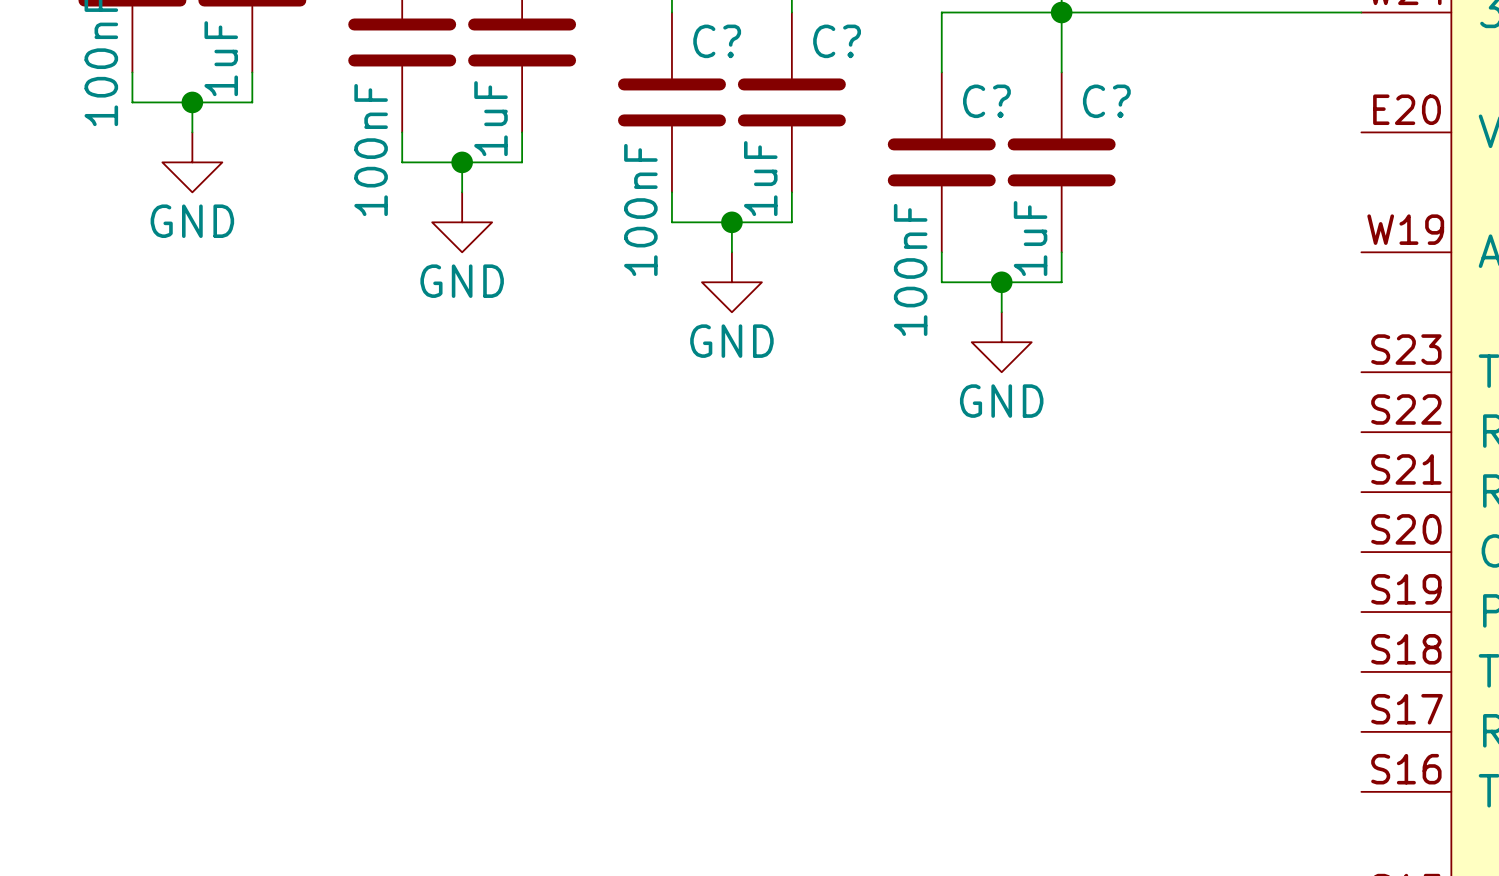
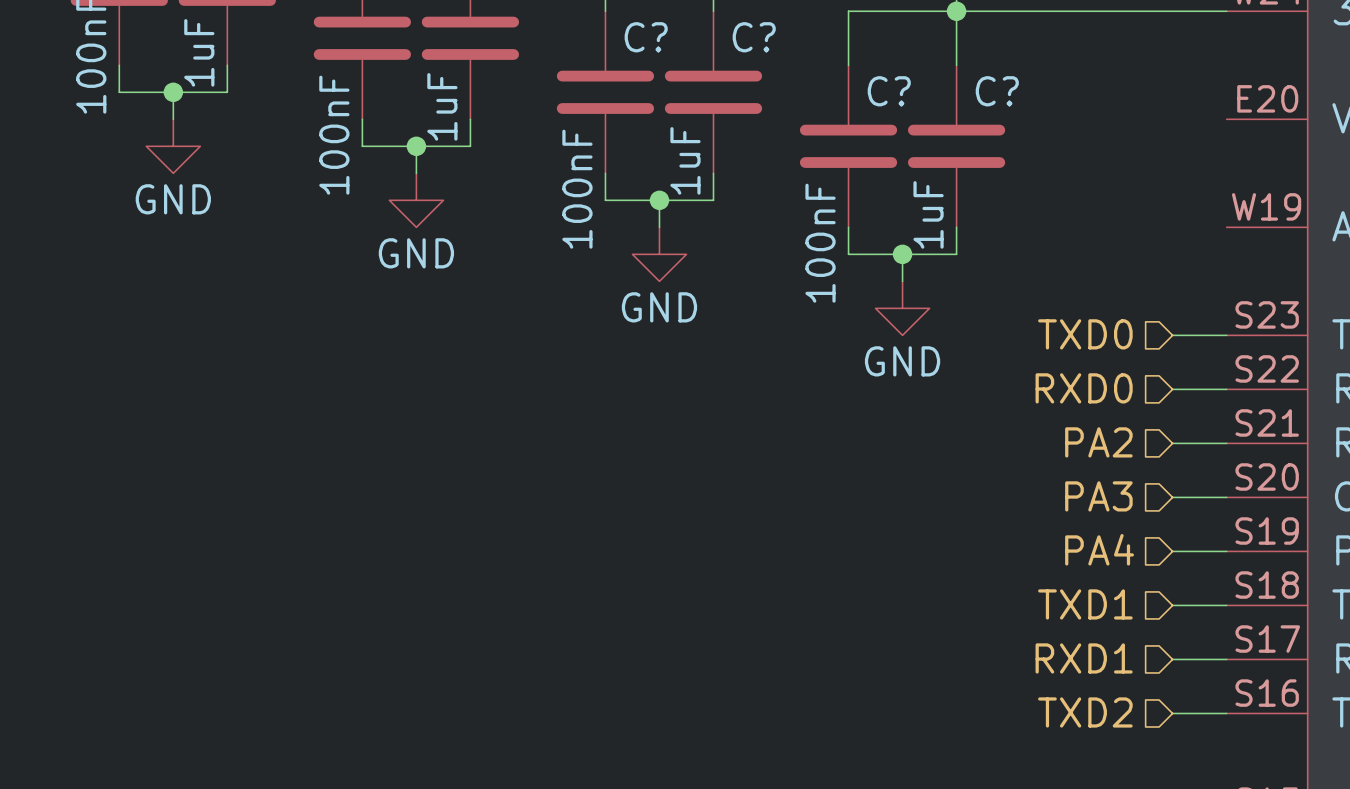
hierarchical label: none -> TXD0 (1085, 334)
wire: none -> (1172, 335) (1226, 335)
hierarchical label: none -> RXD0 (1084, 388)
wire: none -> (1172, 389) (1226, 389)
hierarchical label: none -> PA2 (1098, 442)
wire: none -> (1172, 443) (1226, 443)
hierarchical label: none -> PA3 (1098, 496)
wire: none -> (1172, 497) (1226, 497)
hierarchical label: none -> PA4 (1099, 549)
wire: none -> (1172, 551) (1226, 551)
hierarchical label: none -> TXD1 (1085, 604)
wire: none -> (1172, 605) (1226, 605)
hierarchical label: none -> RXD1 (1084, 658)
wire: none -> (1172, 659) (1226, 659)
hierarchical label: none -> TXD2 (1085, 712)
wire: none -> (1172, 713) (1226, 713)

